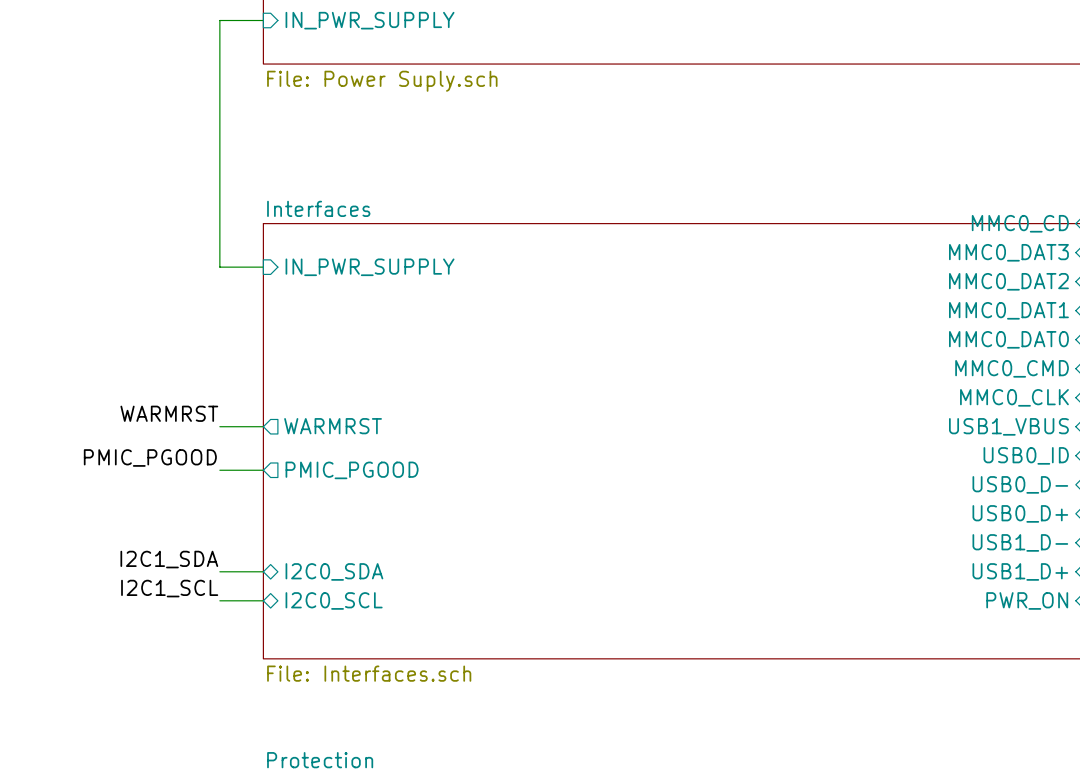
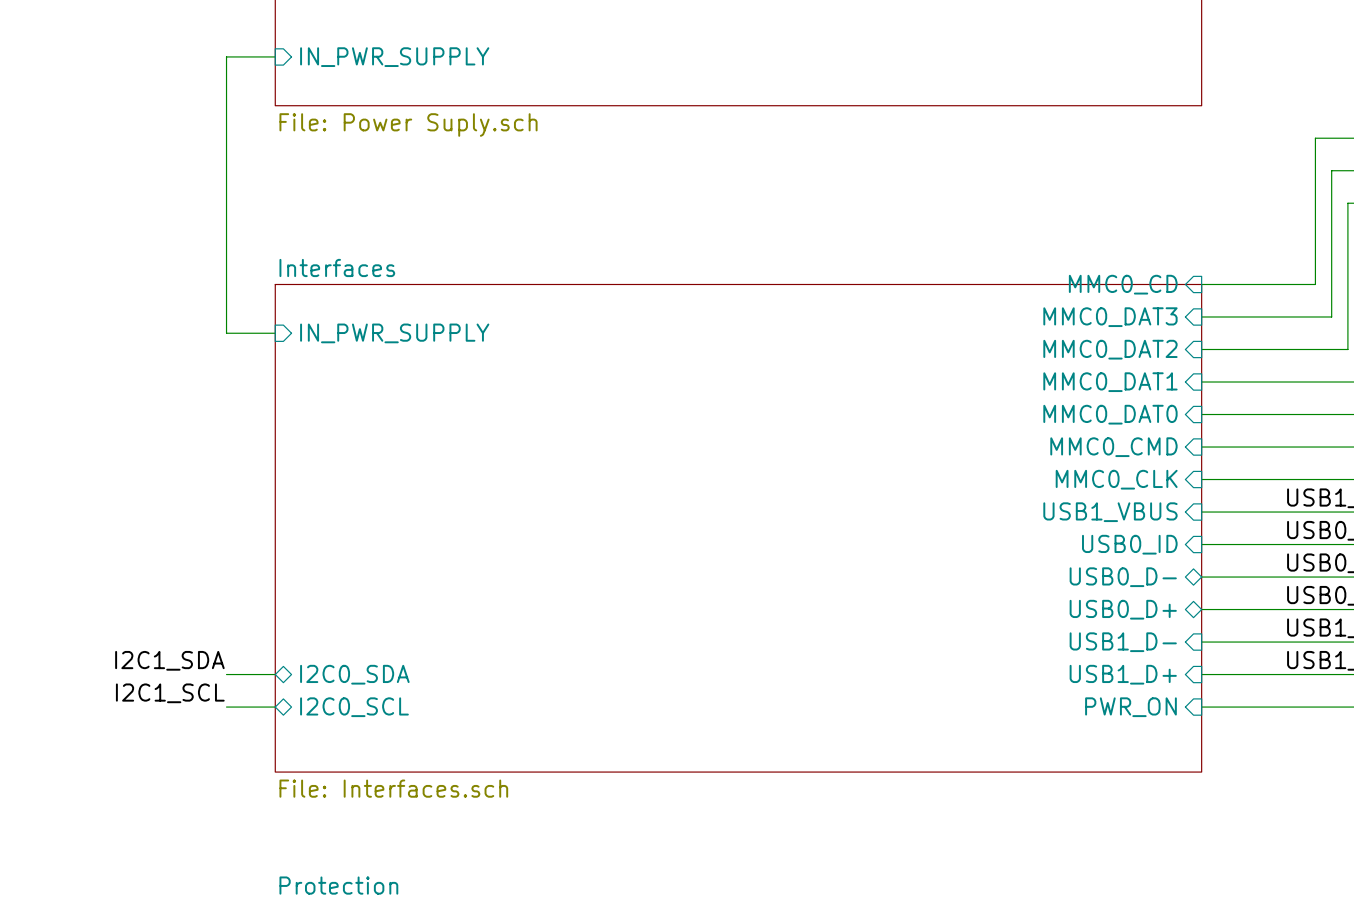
label: WARMRST (169, 413) -> none
wire: (219, 426) (263, 426) -> none
sheet pin: WARMRST (333, 426) -> none
label: PMIC_PGOOD (150, 457) -> none
wire: (219, 470) (263, 470) -> none
sheet pin: PMIC_PGOOD (352, 470) -> none

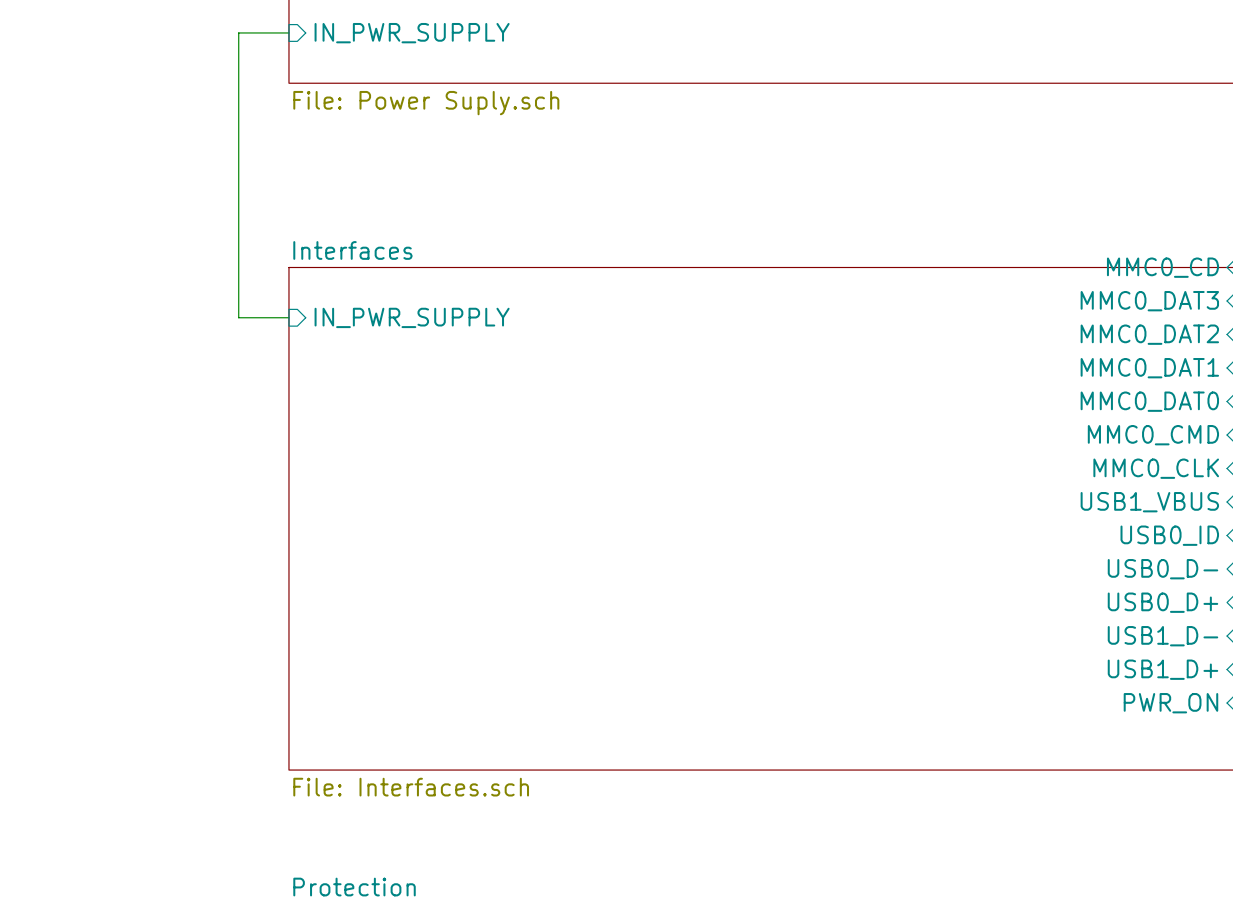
label: I2C1_SDA (169, 660) -> none
wire: (226, 674) (275, 674) -> none
sheet pin: I2C0_SDA (354, 674) -> none
label: I2C1_SCL (170, 693) -> none
wire: (226, 707) (275, 707) -> none
sheet pin: I2C0_SCL (354, 707) -> none

